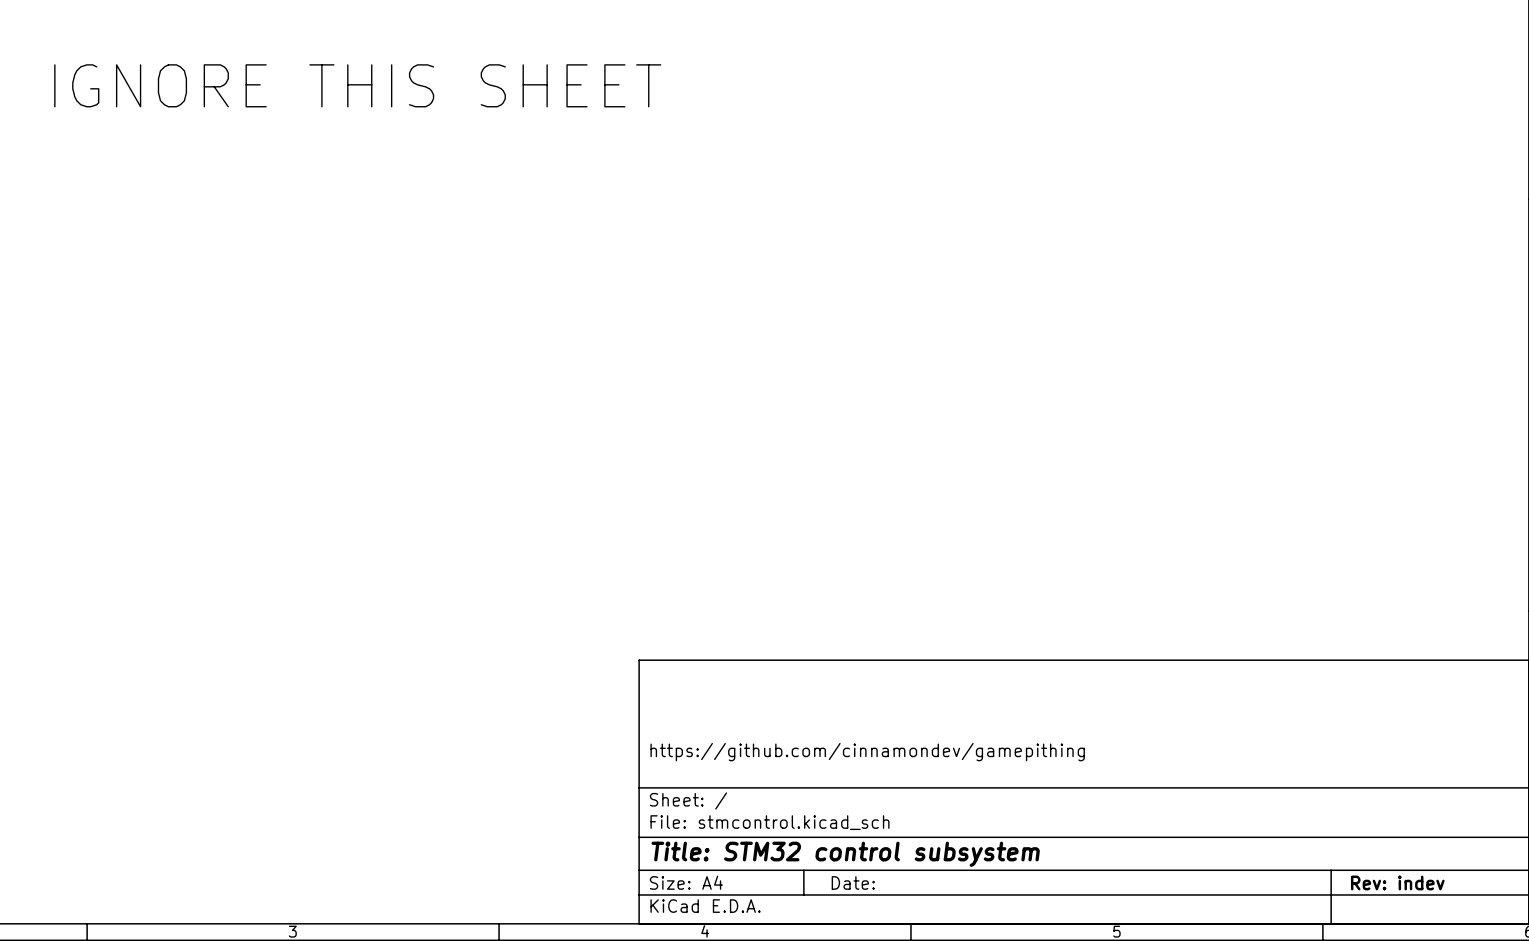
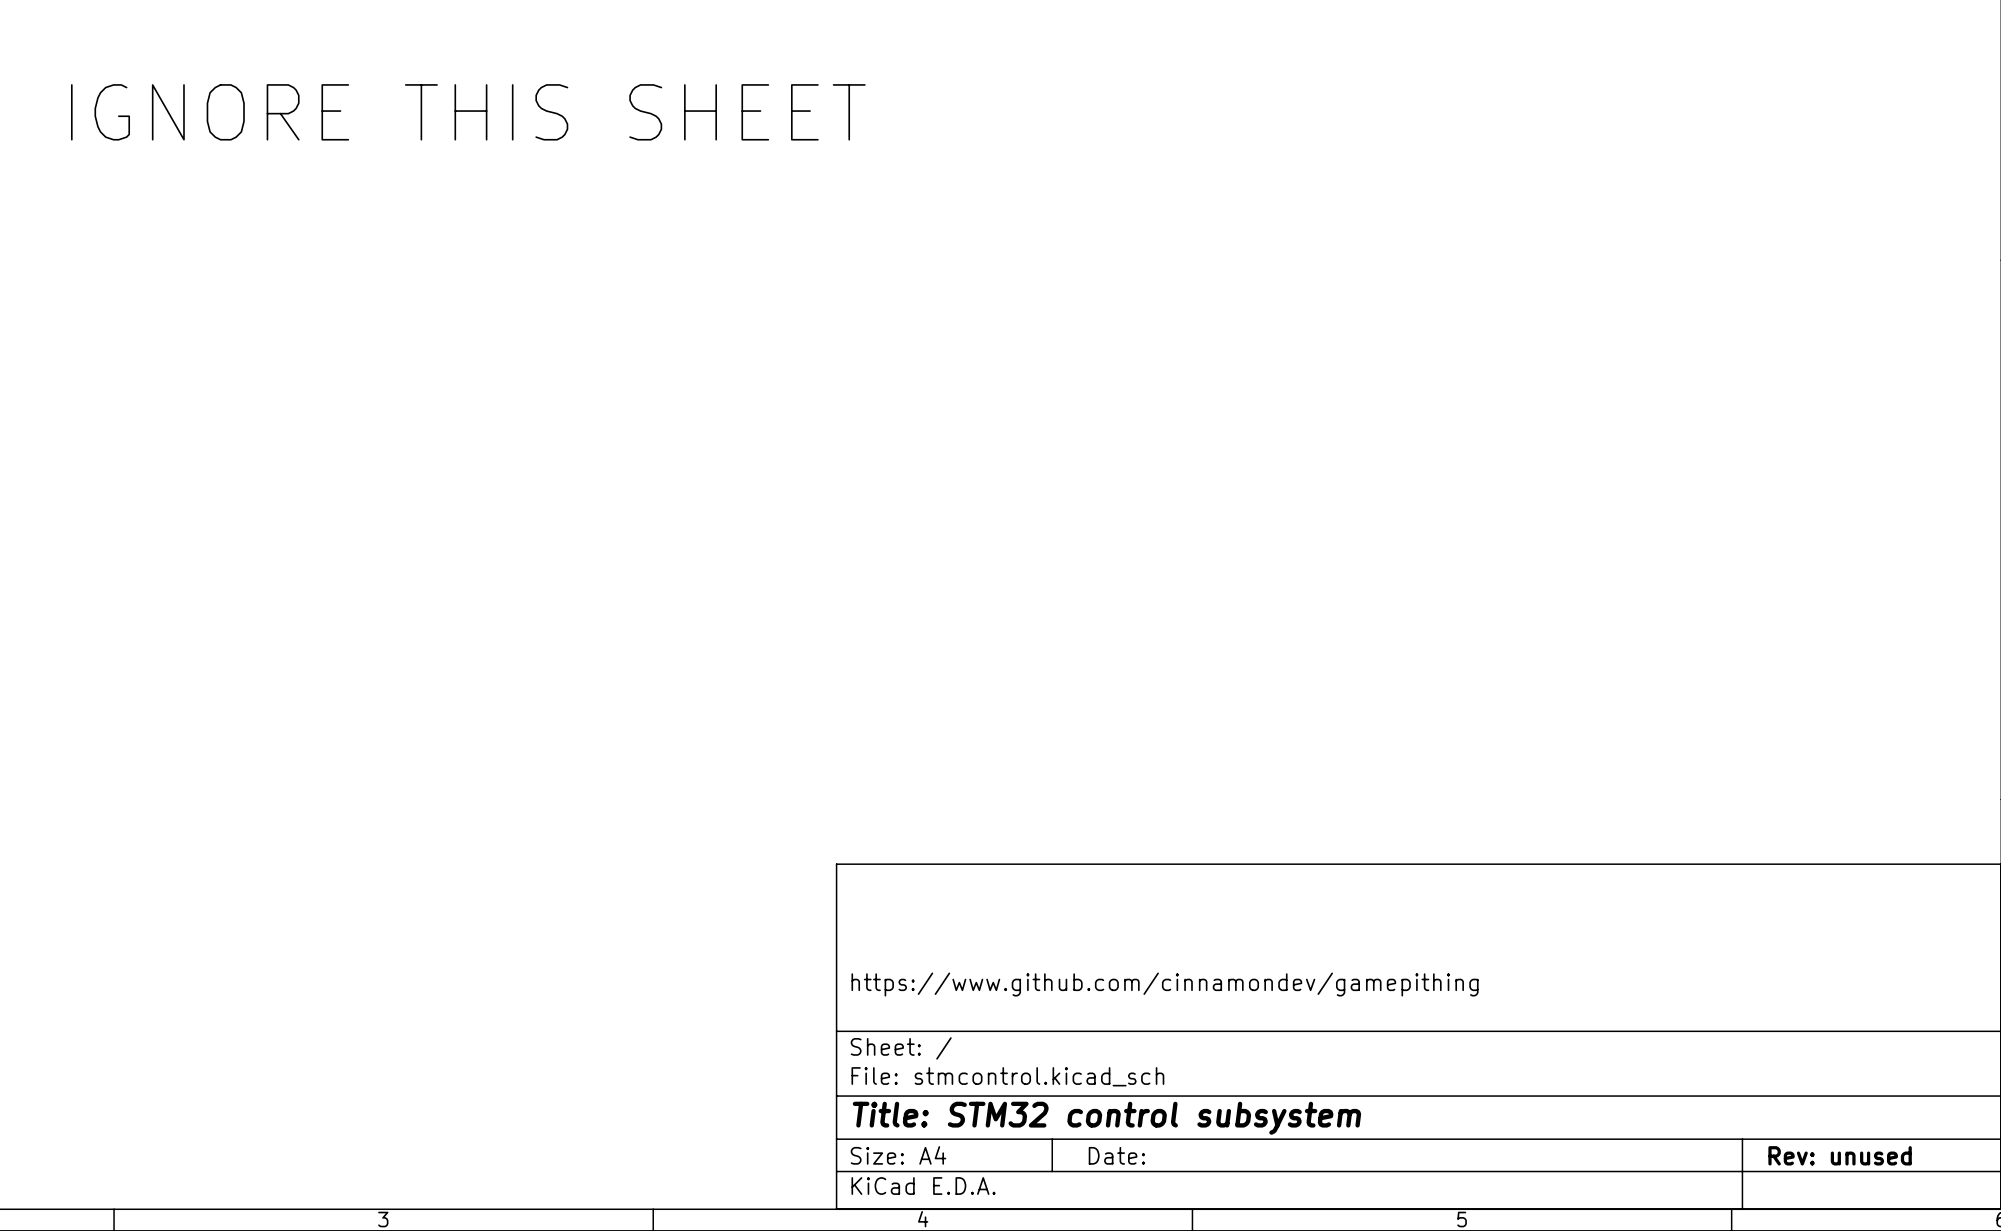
title block: https://github.com/cinnamondev/gamepithing (867, 752) -> https://www.github.com/cinnamondev/gamepithing (1165, 984)
title block: Rev: indev (1397, 882) -> Rev: unused (1840, 1155)

